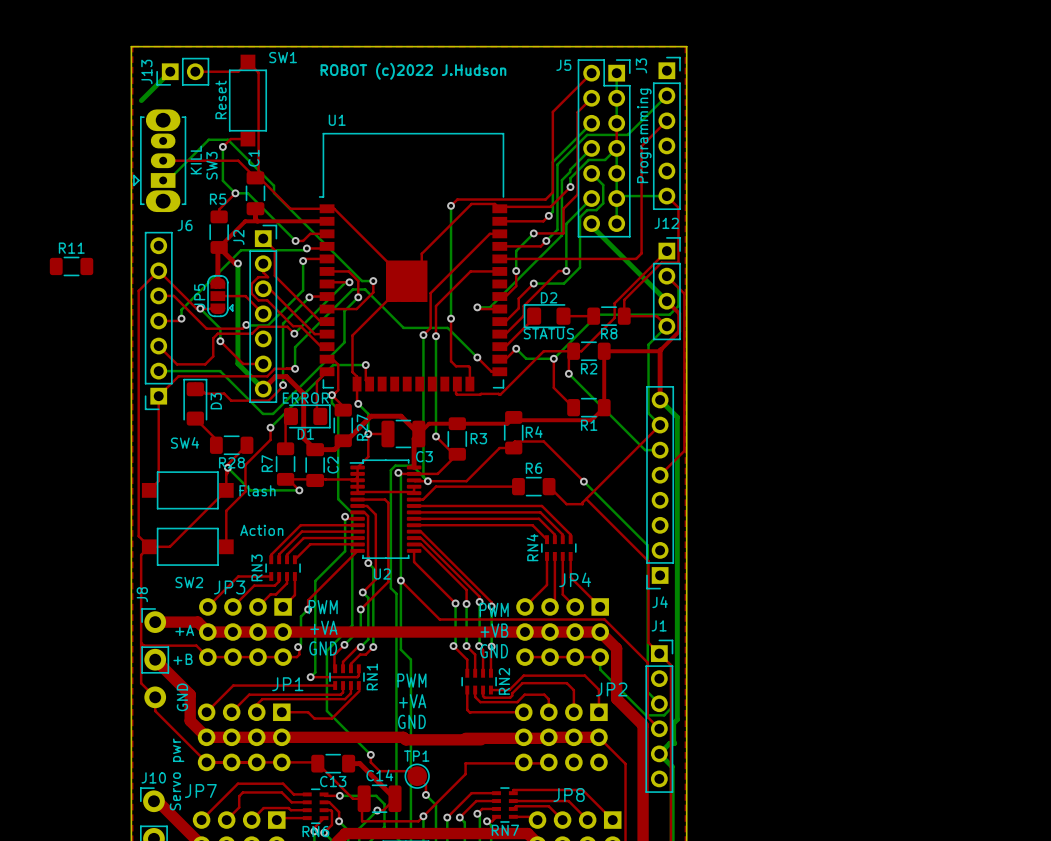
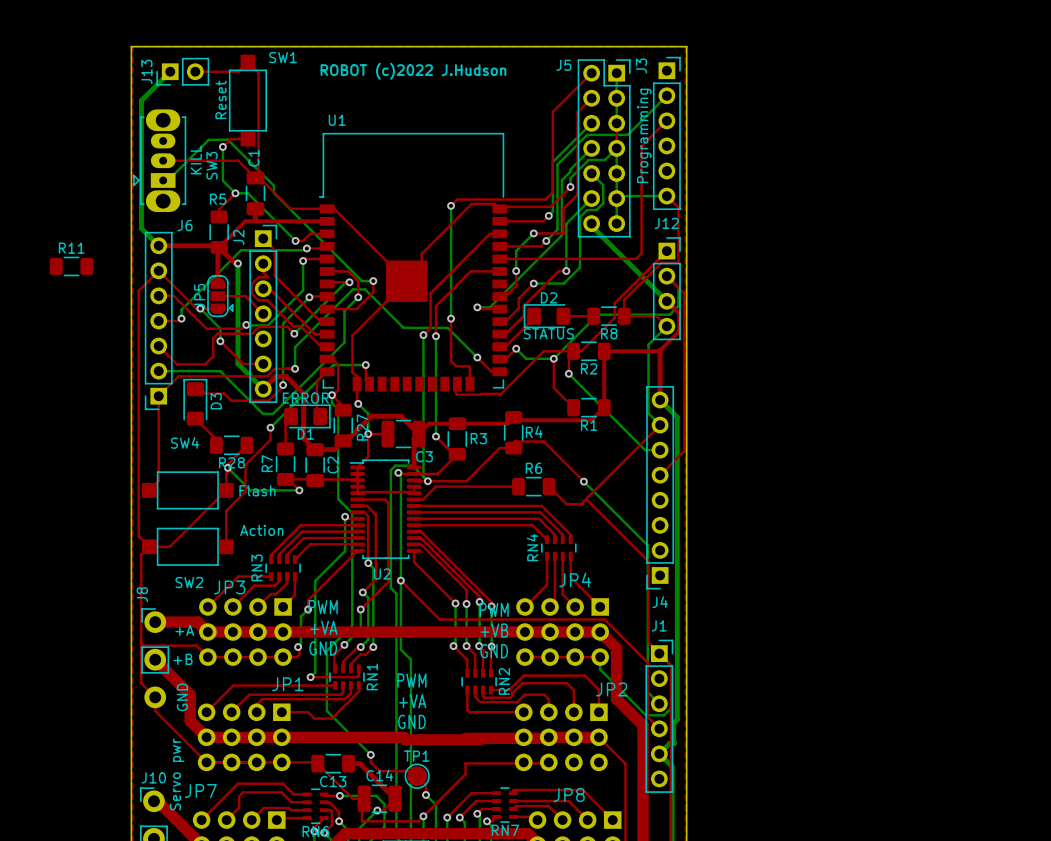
bottom track: none -> (141, 100) (141, 228) (158, 245)
top track: none -> (158, 245) (217, 245)

